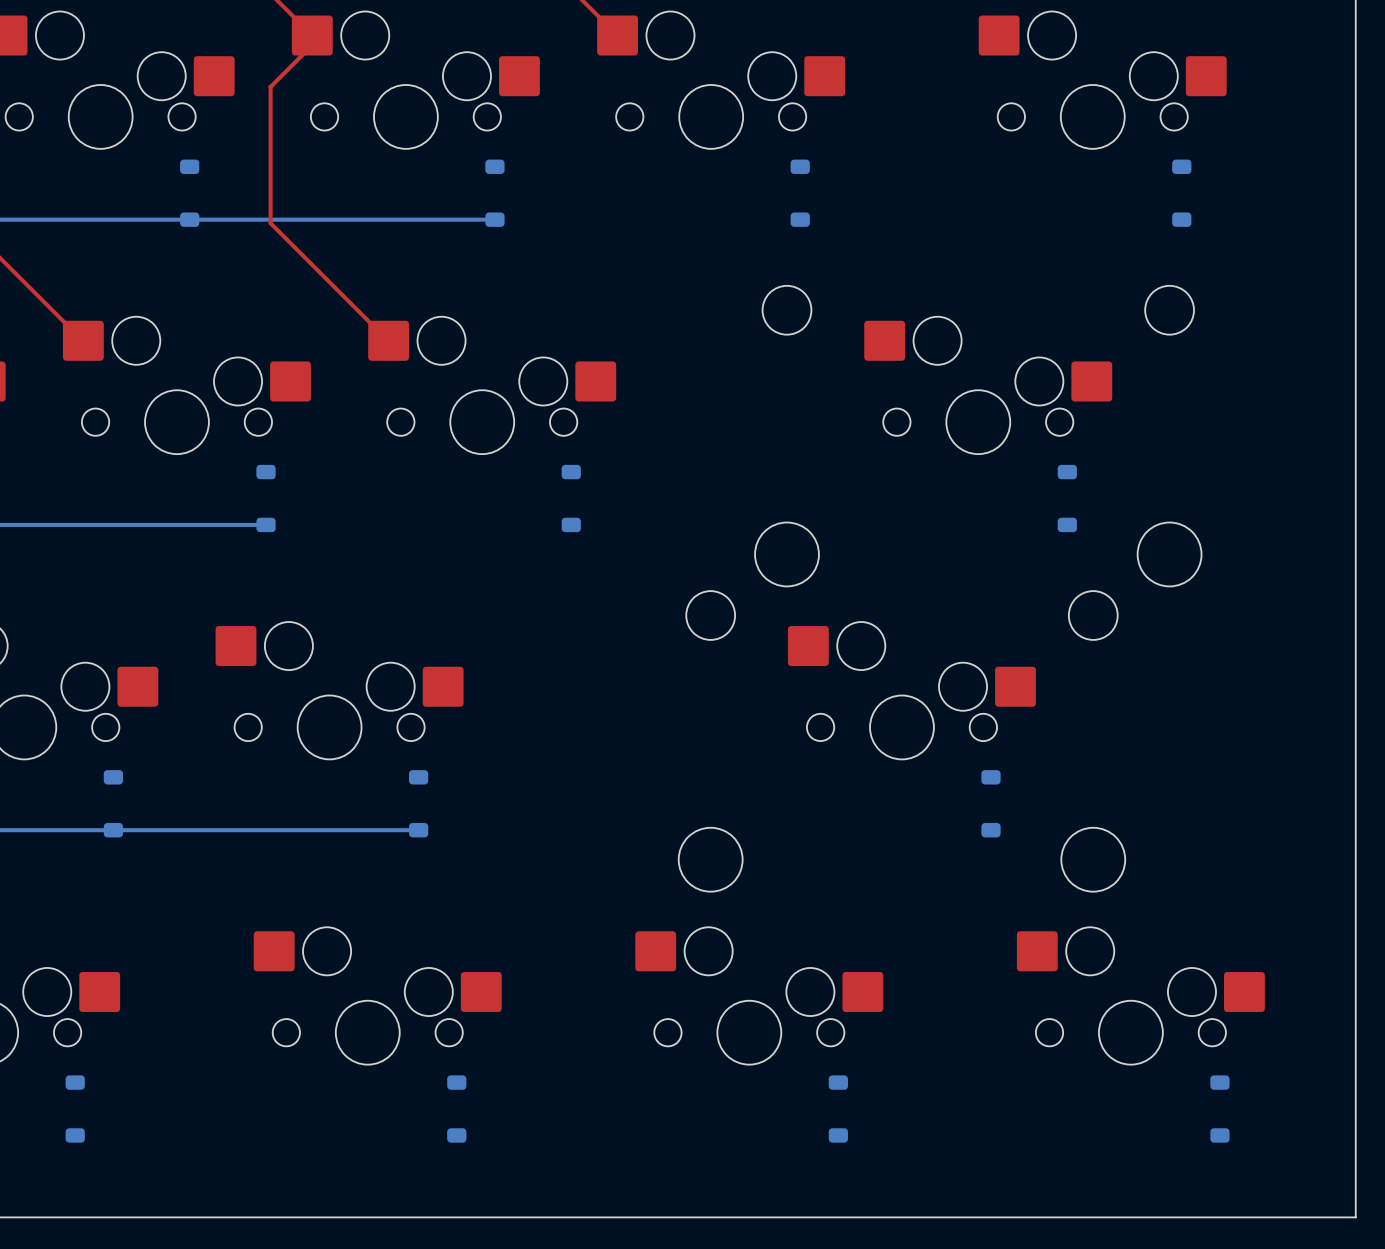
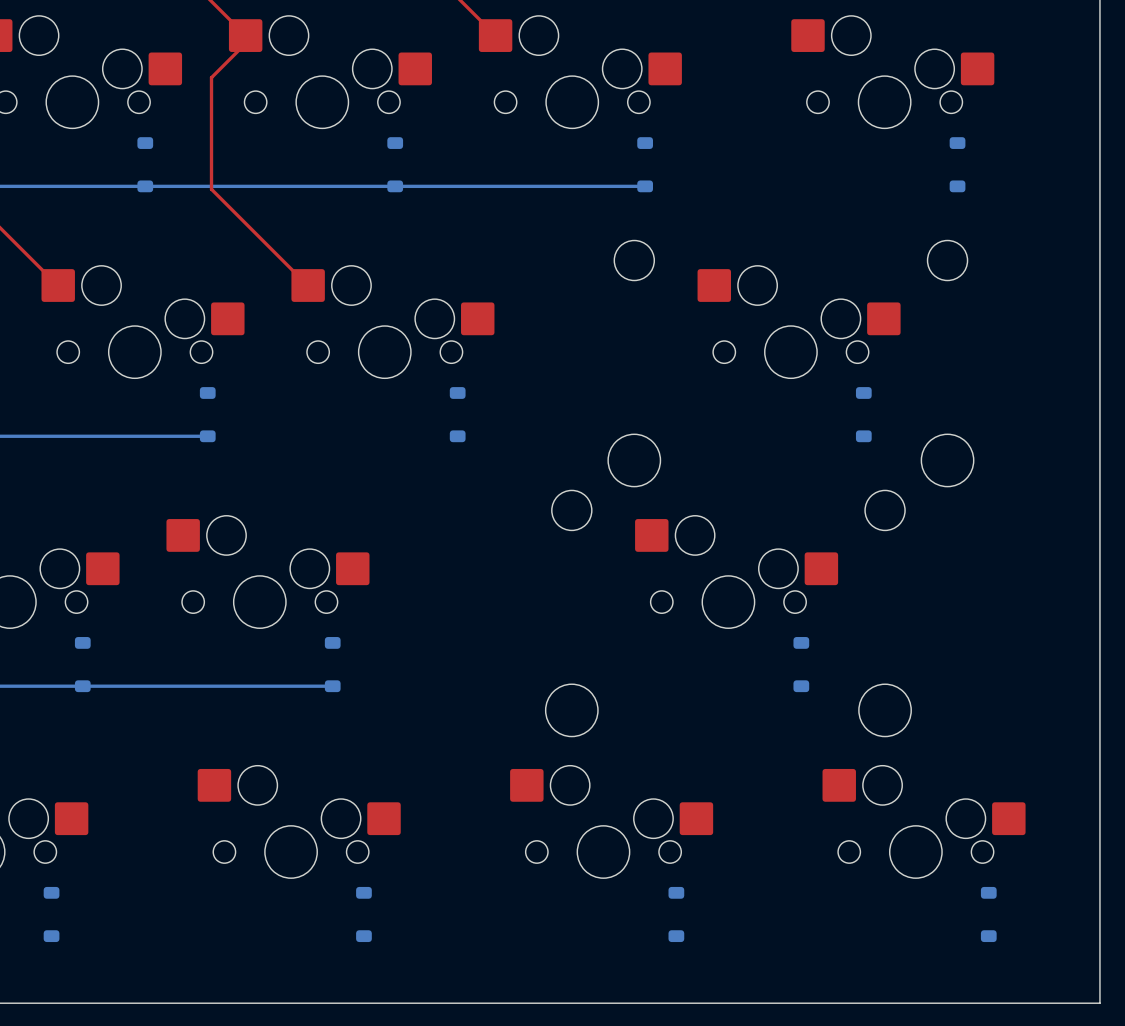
bottom track: none -> (395, 186) (645, 186)

